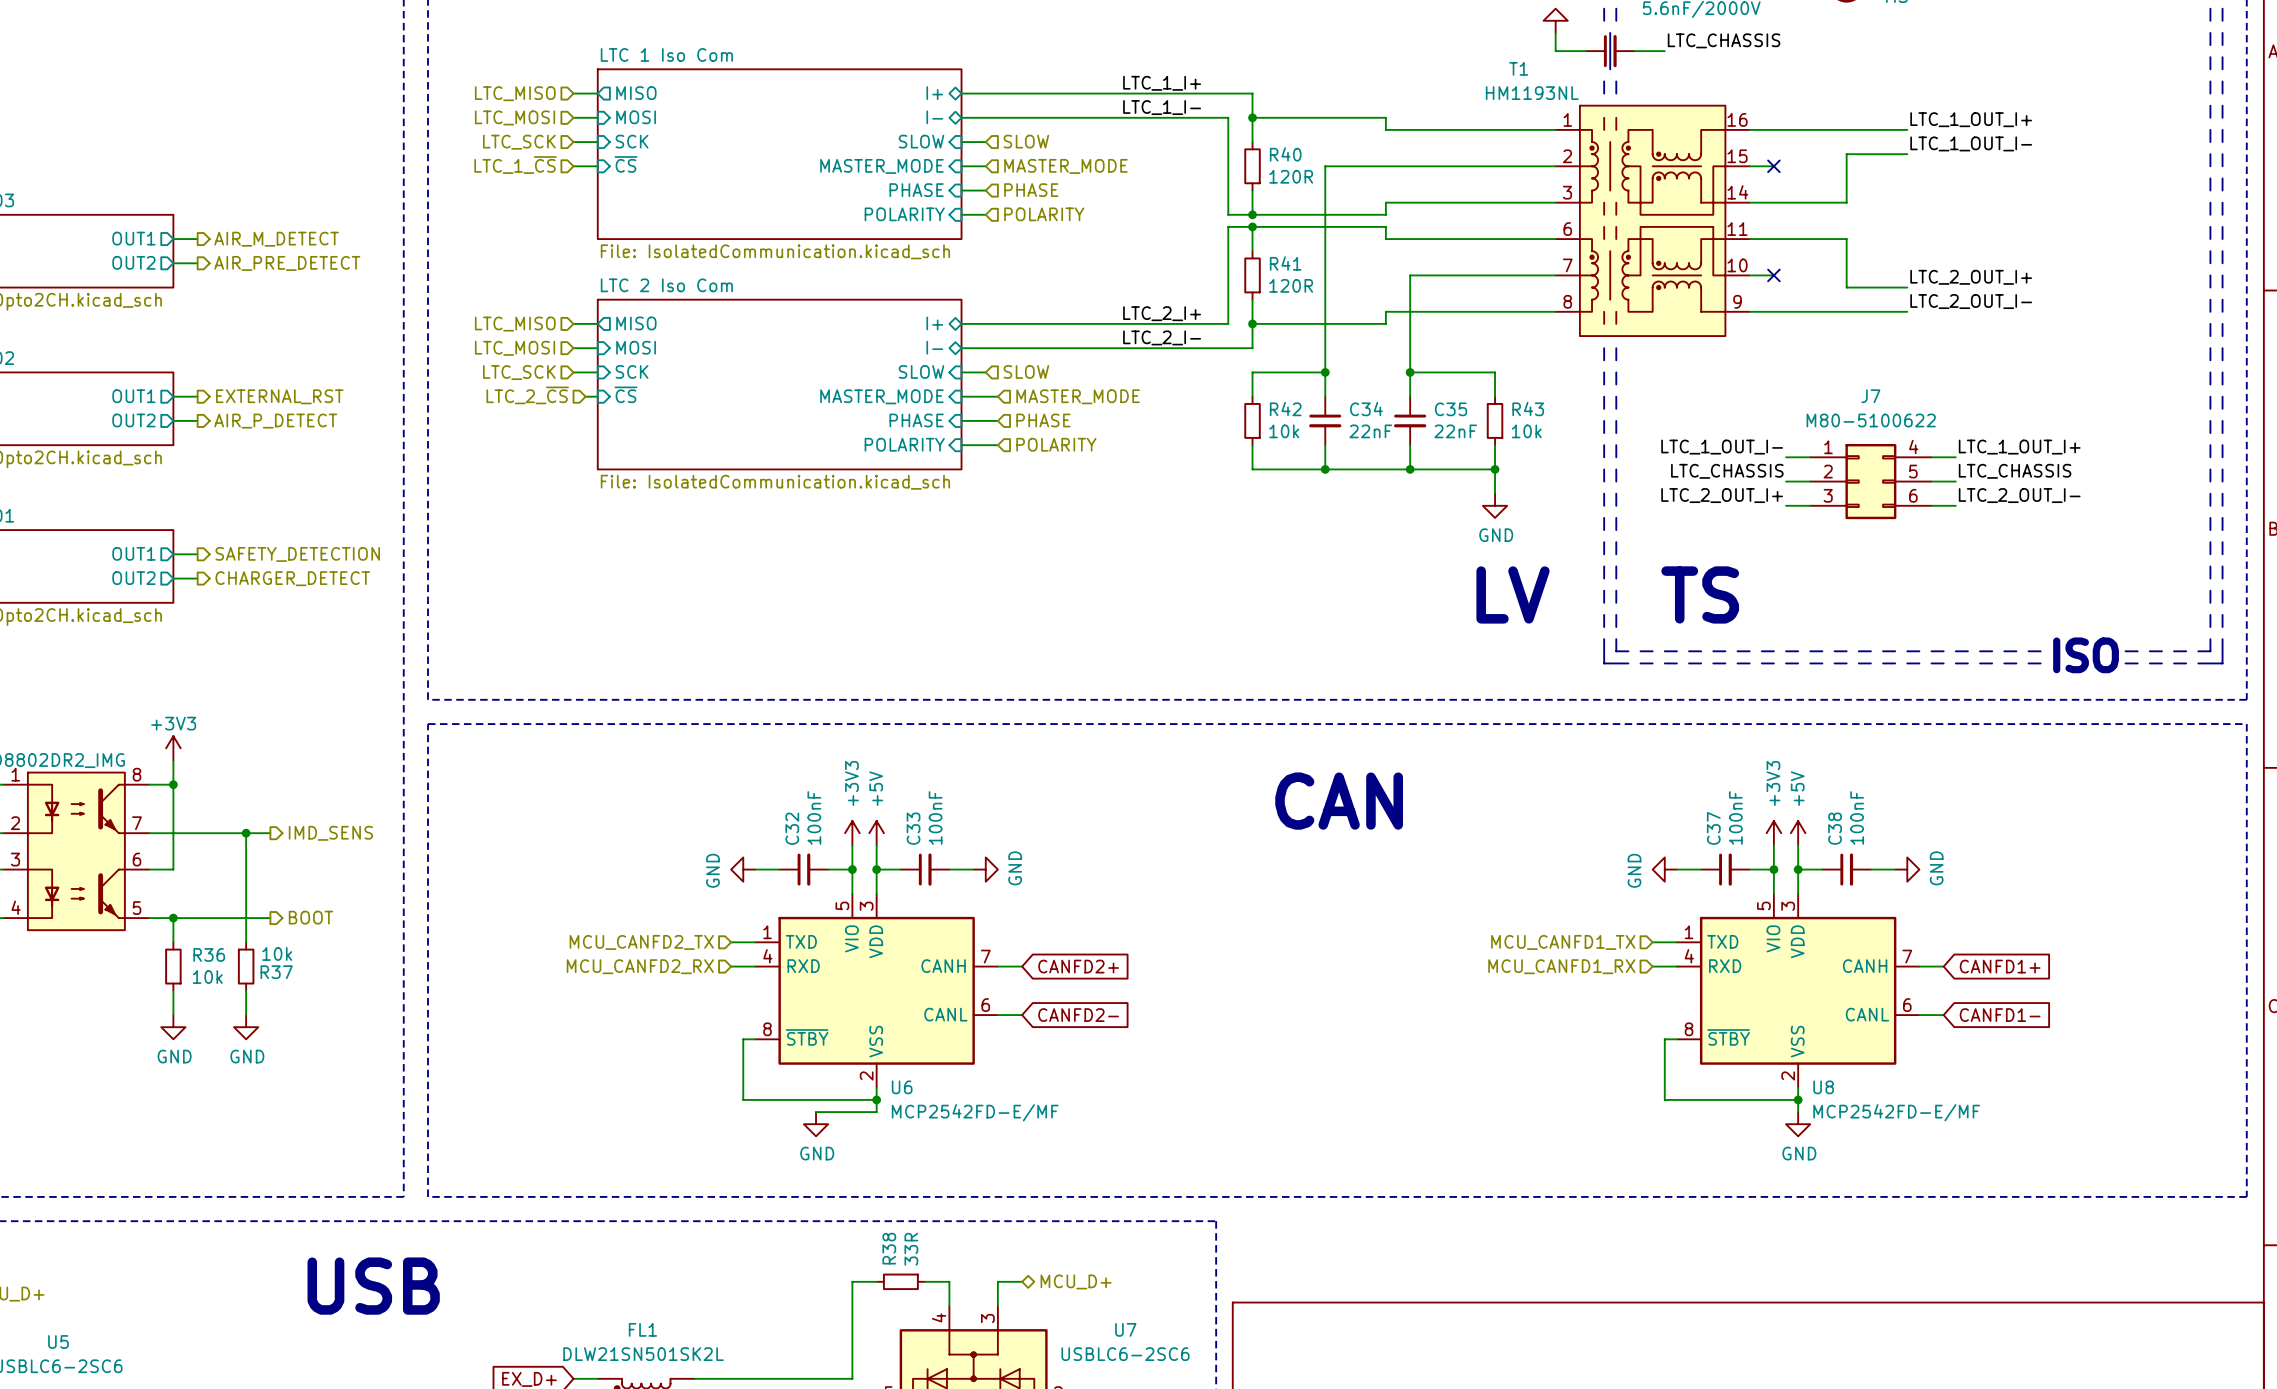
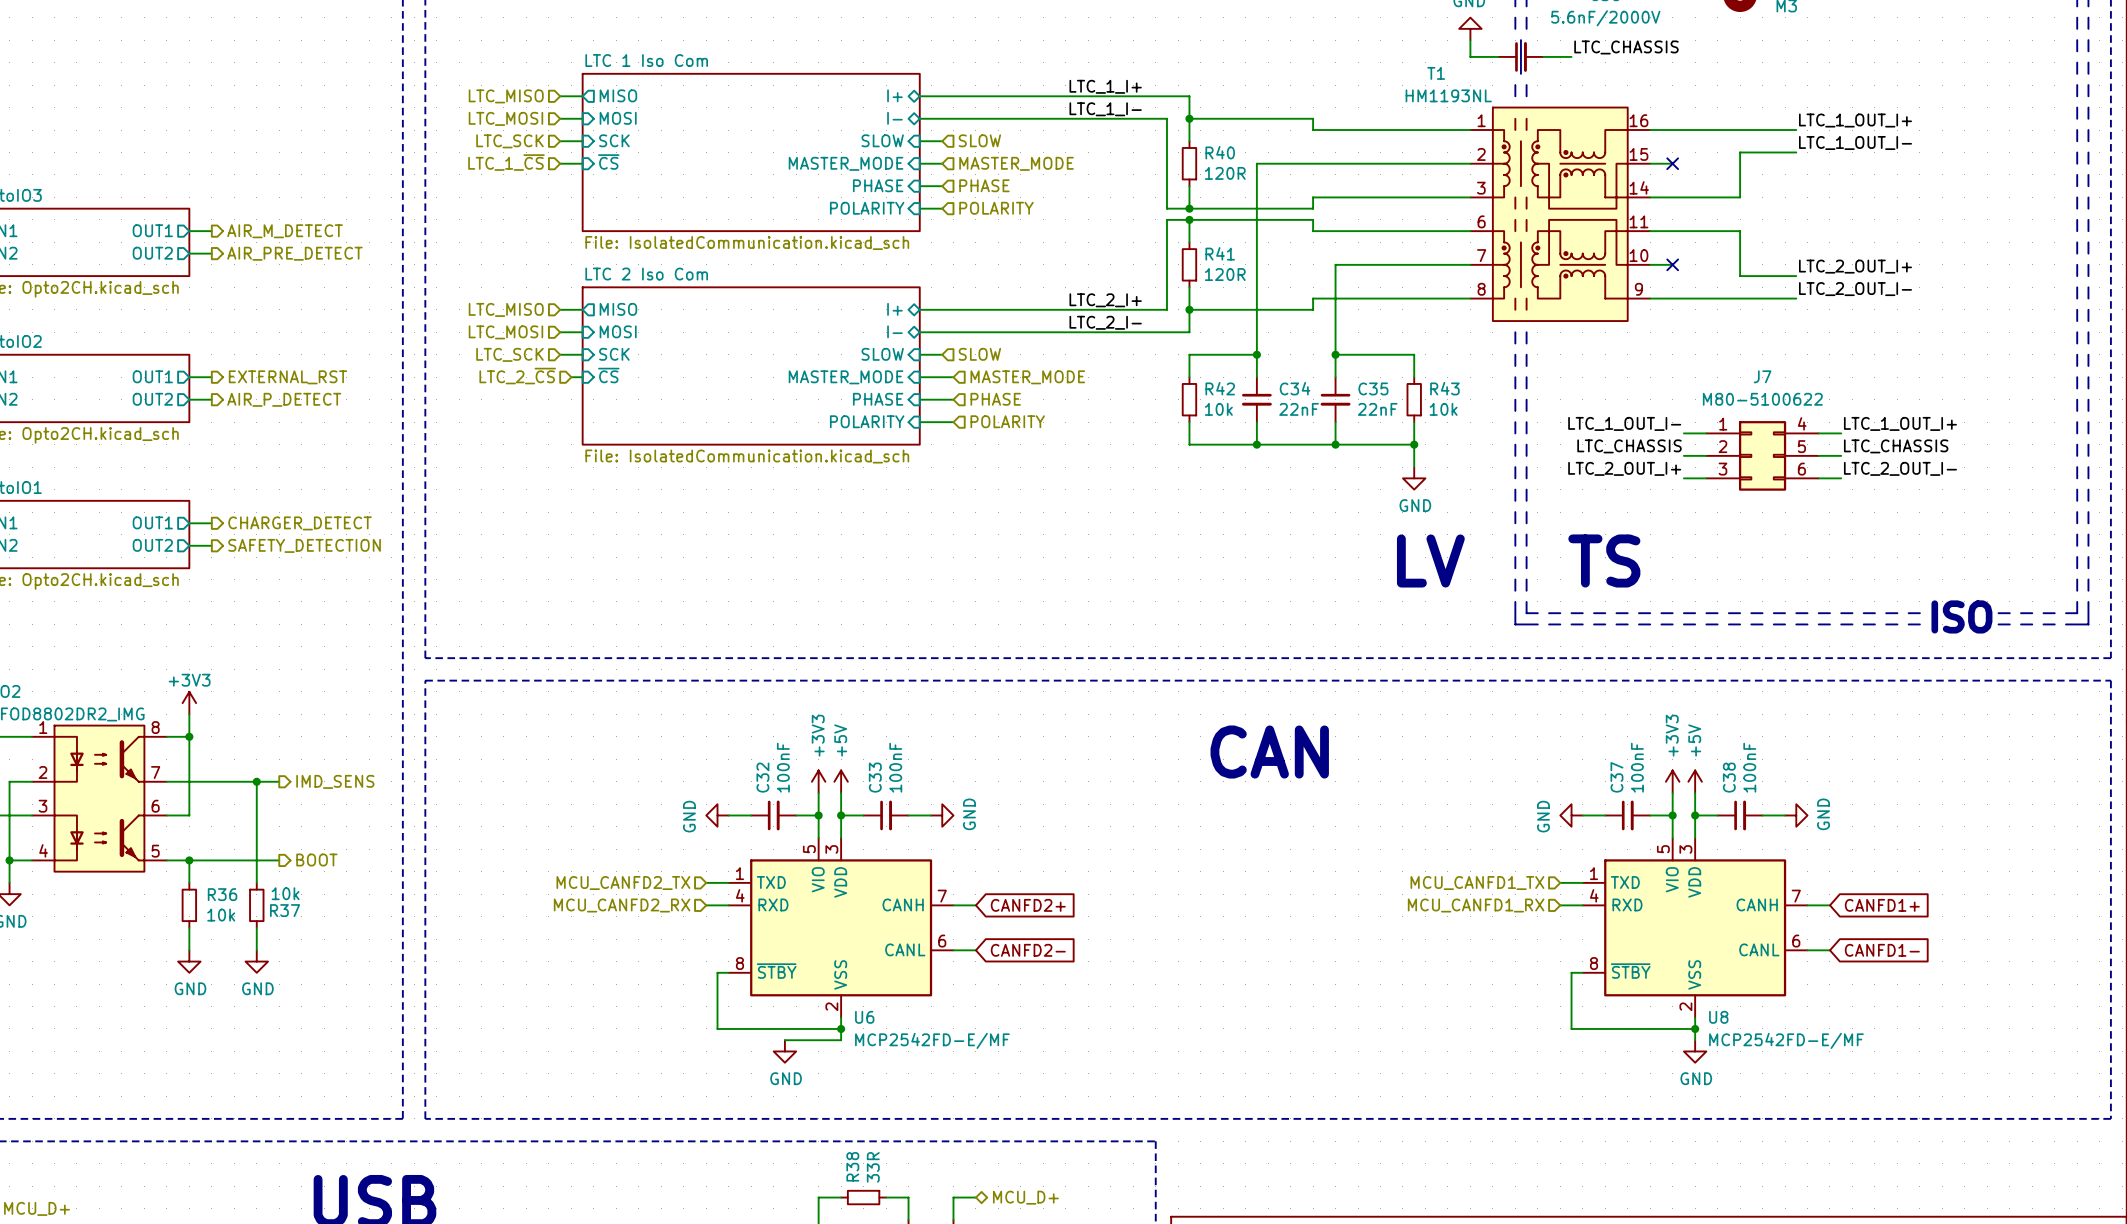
hierarchical label: SAFETY_DETECTION (297, 554) -> CHARGER_DETECT (300, 523)
hierarchical label: CHARGER_DETECT (292, 578) -> SAFETY_DETECTION (304, 545)

